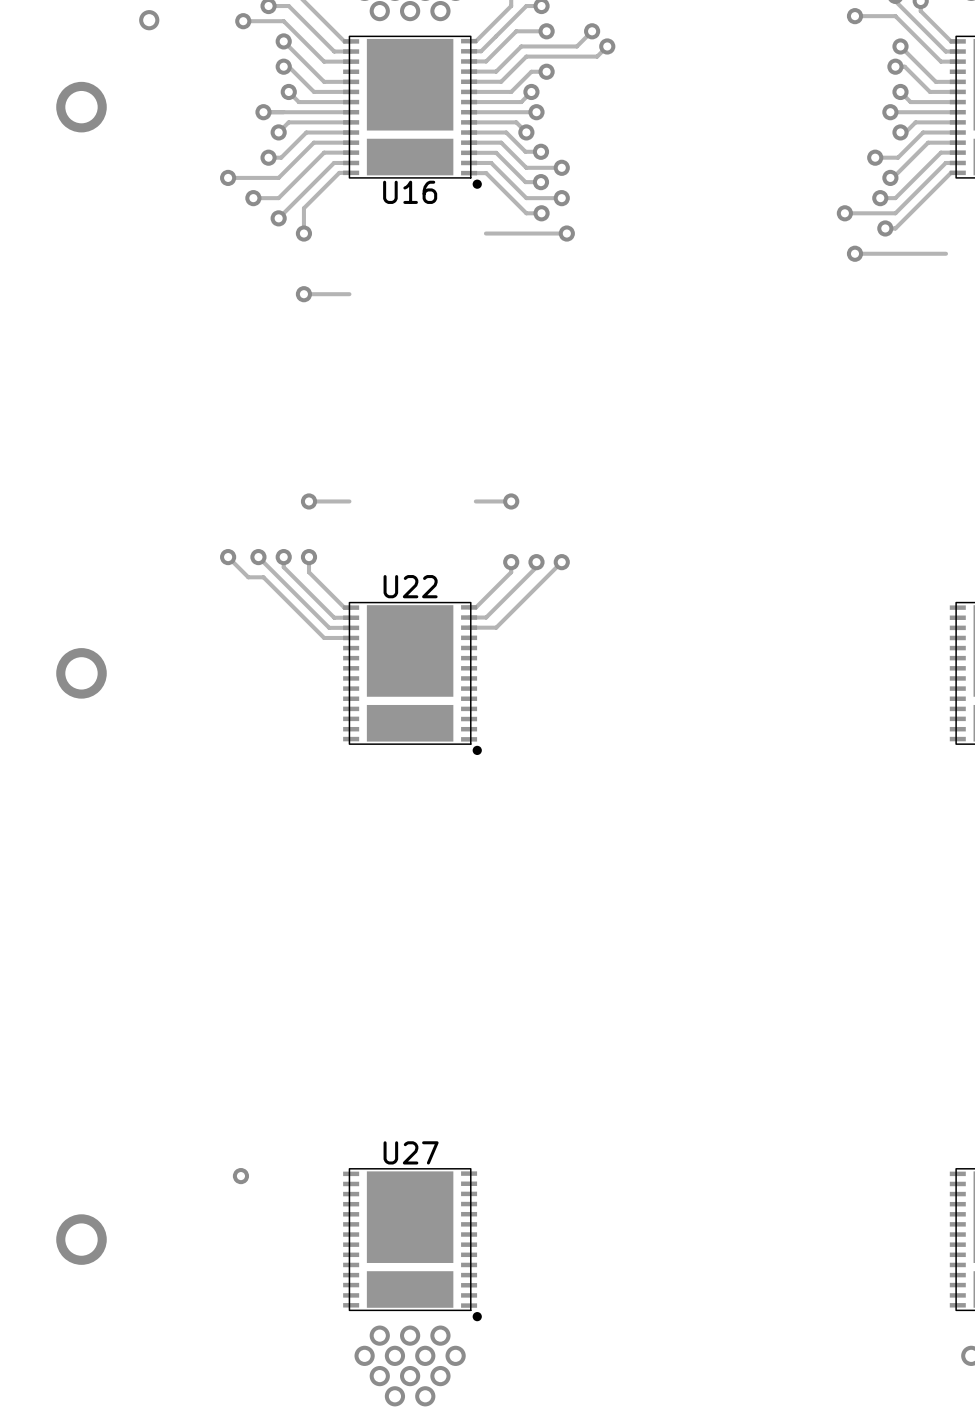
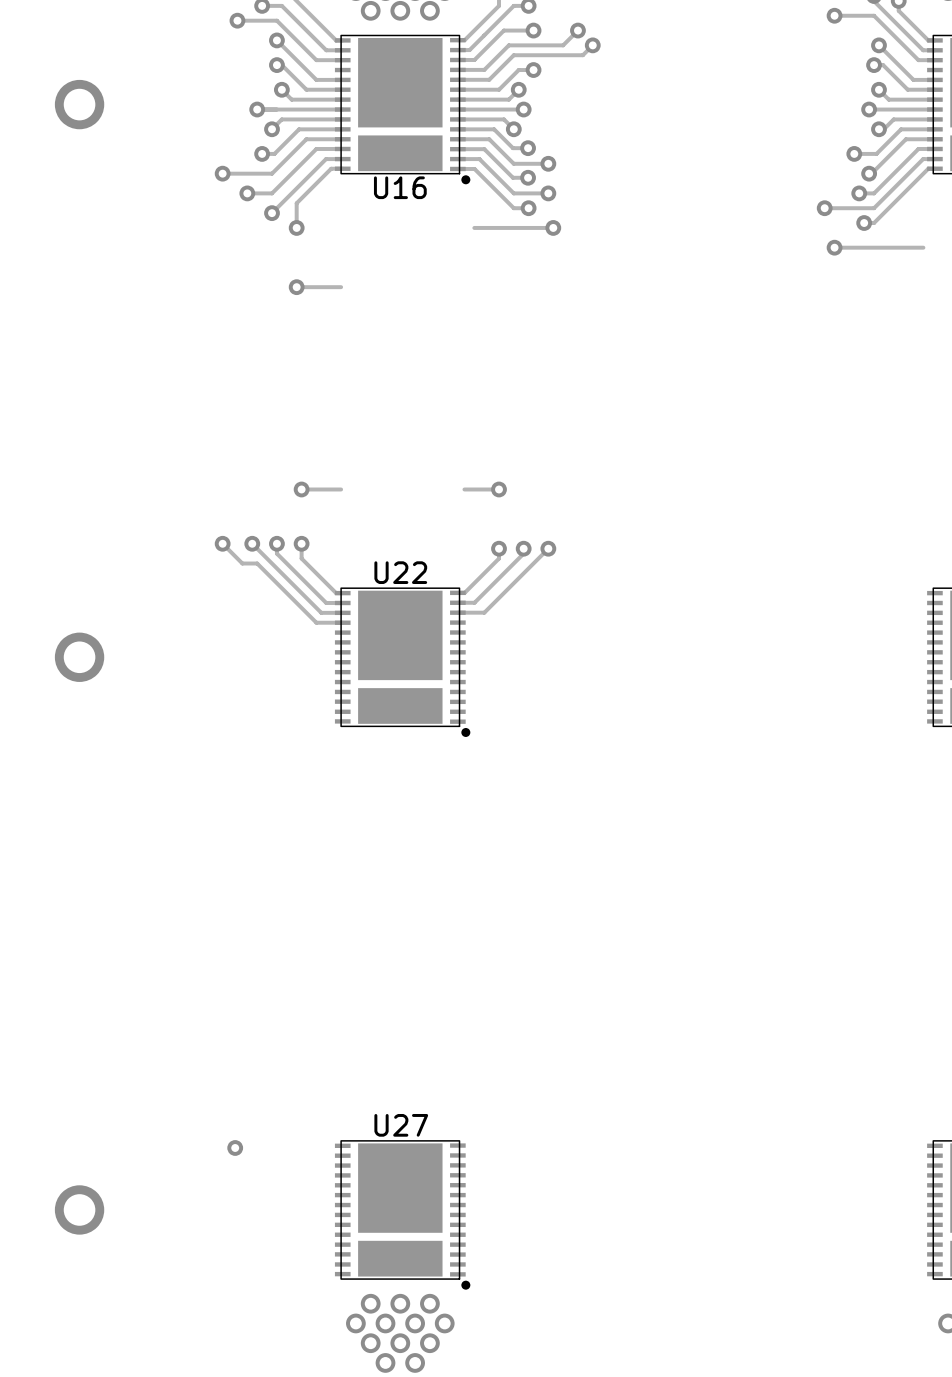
via: (149, 20) -> none

